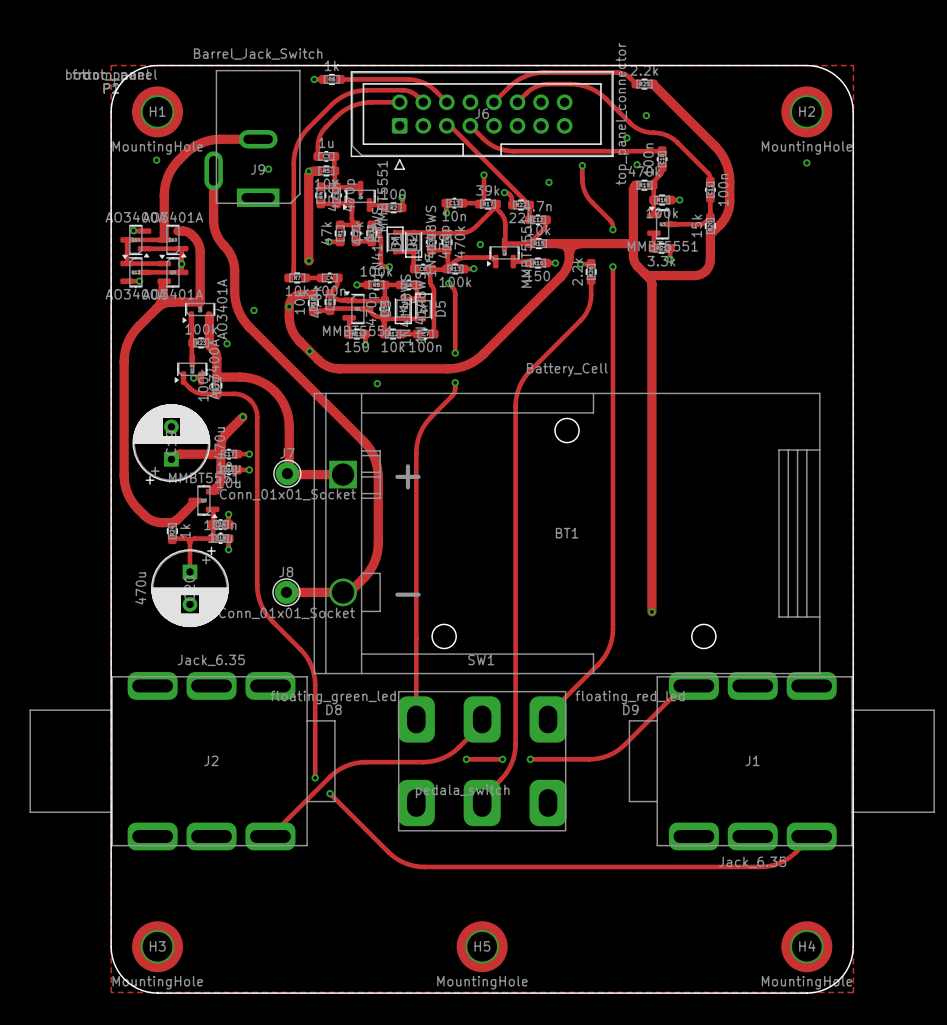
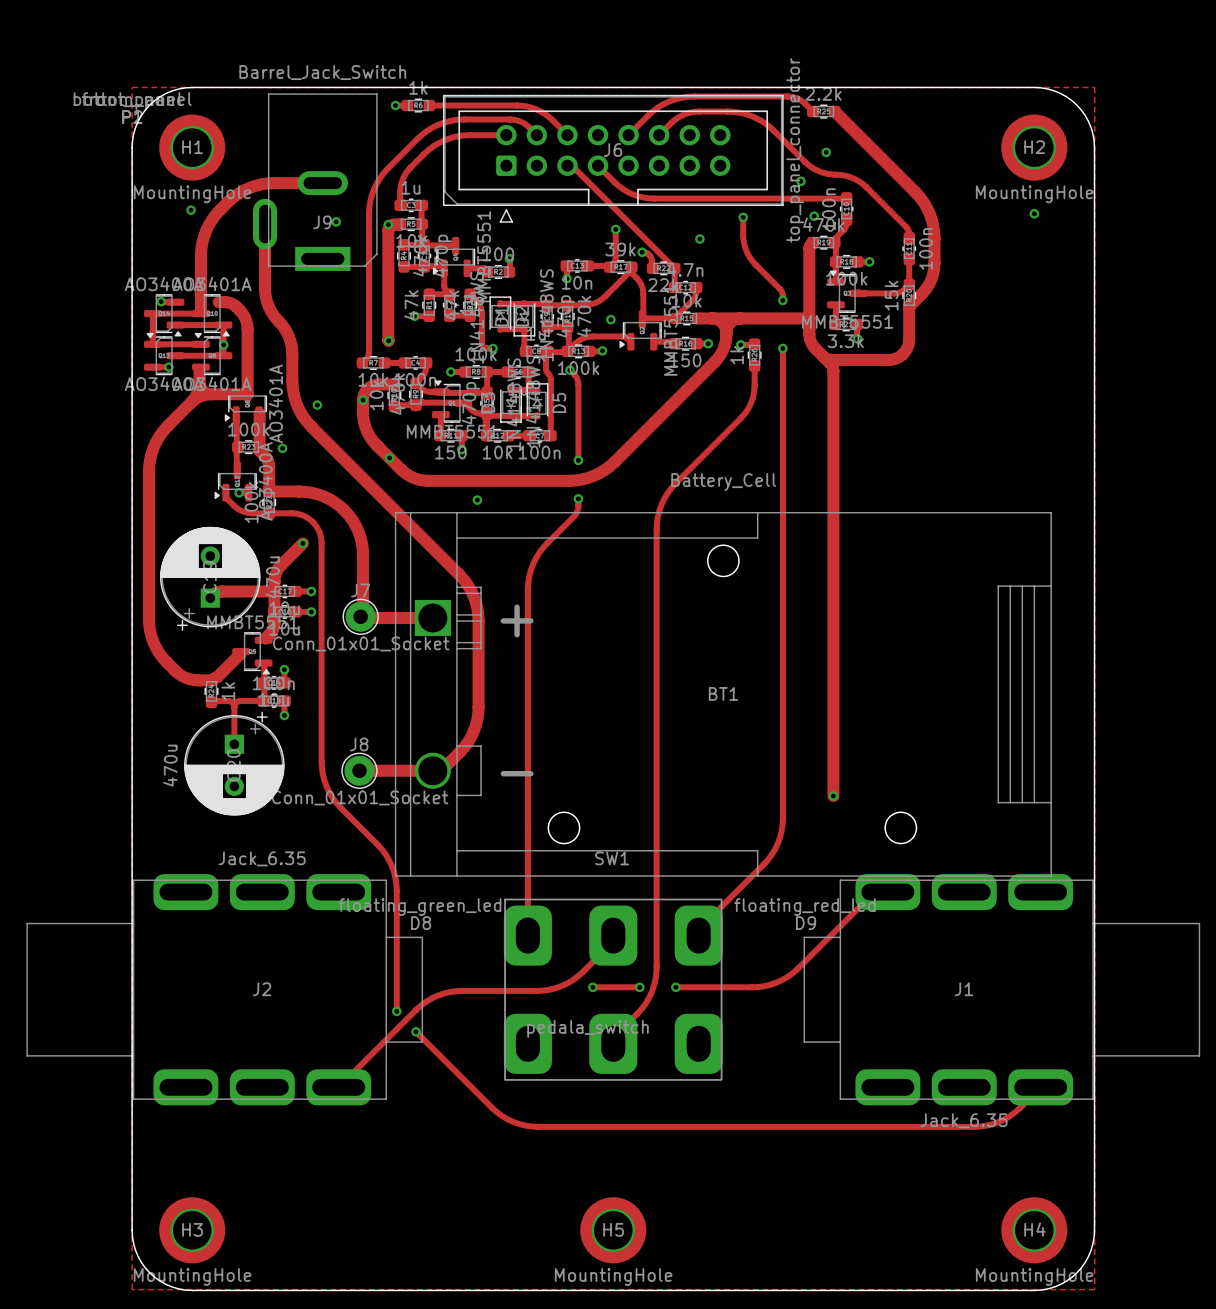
part value: 2.2k (577, 272) -> 1k (737, 355)

